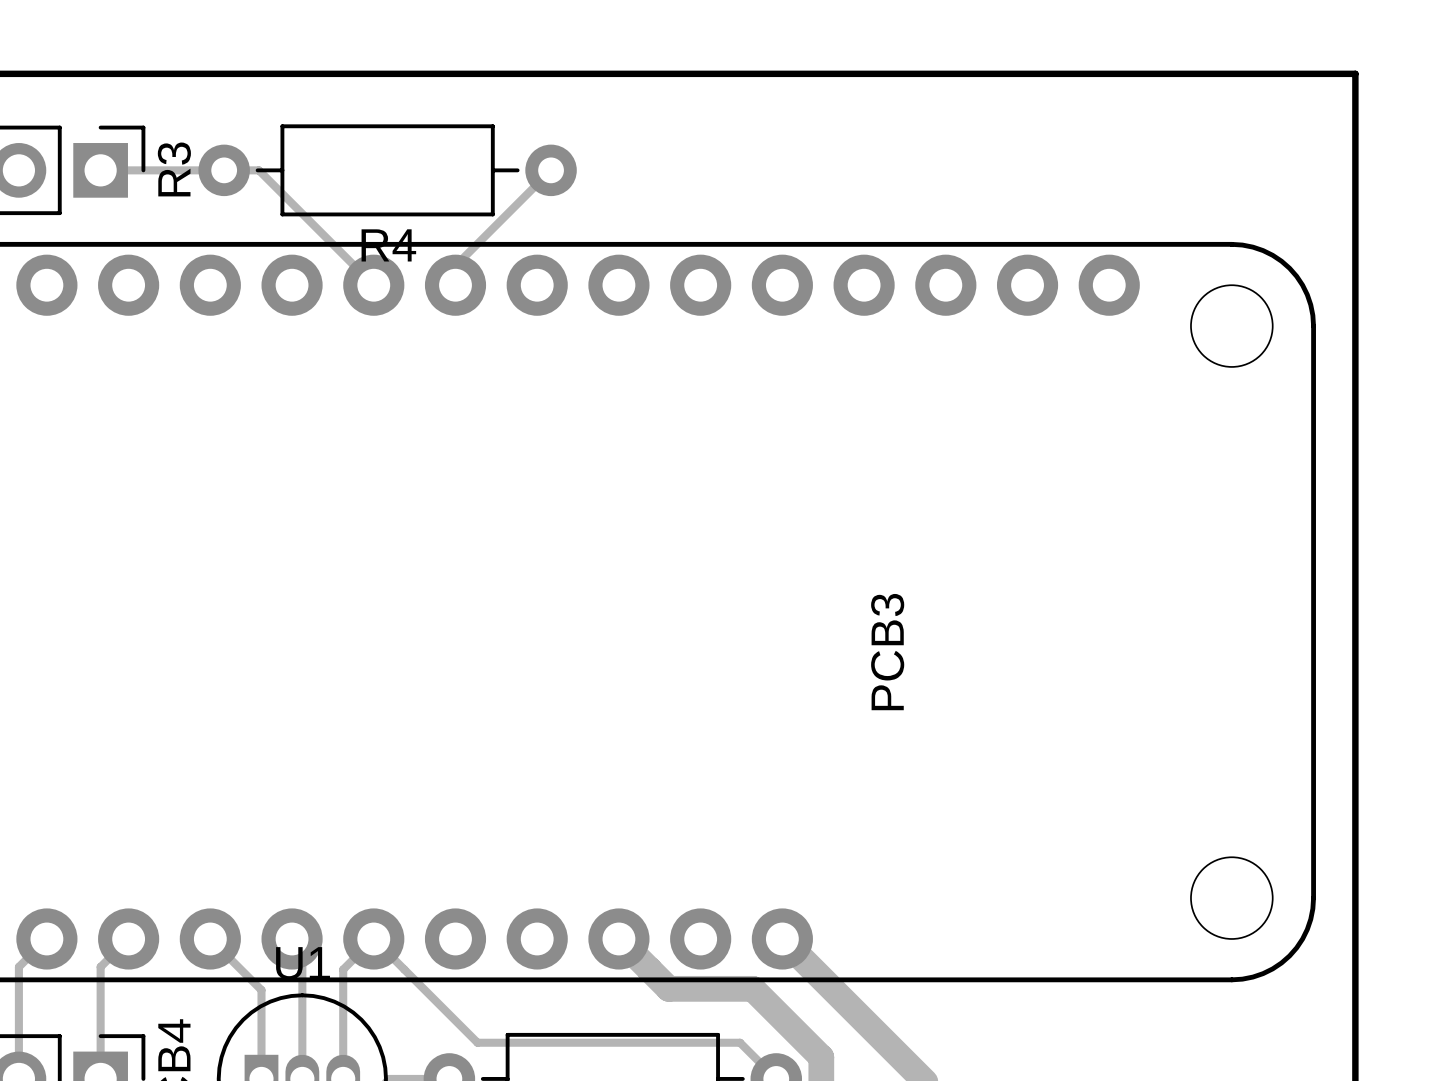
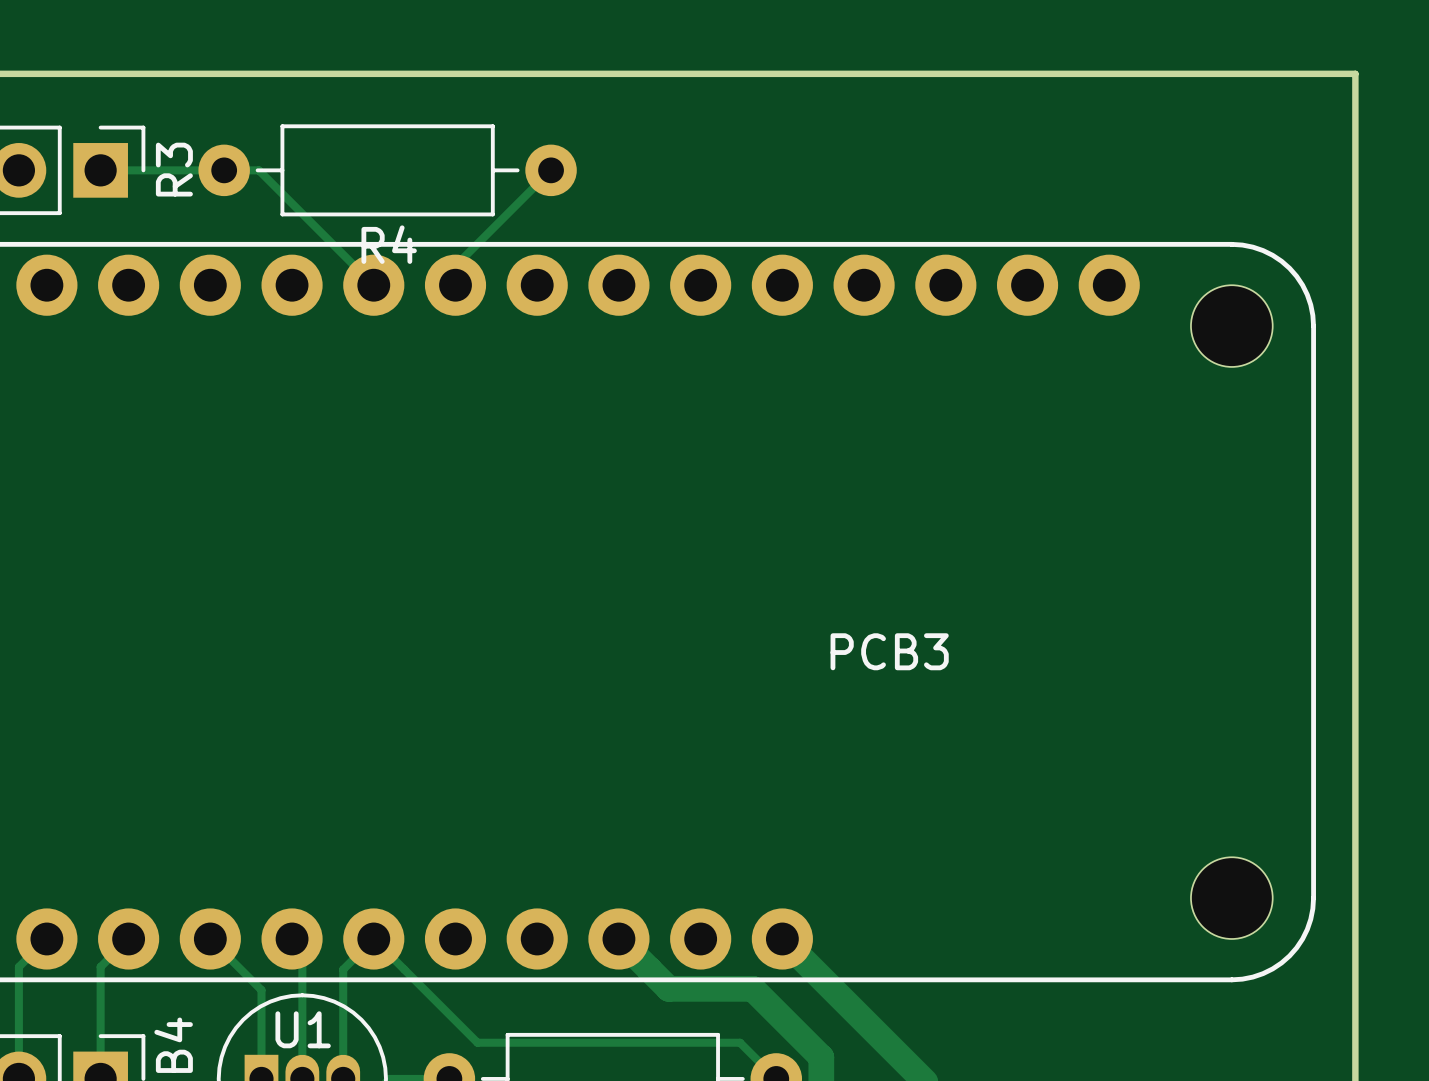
PCB3 name rotation: 0° (887, 652) -> 90° clockwise (889, 651)
U1 name position: U1 (303, 963) -> U1 (303, 1029)

